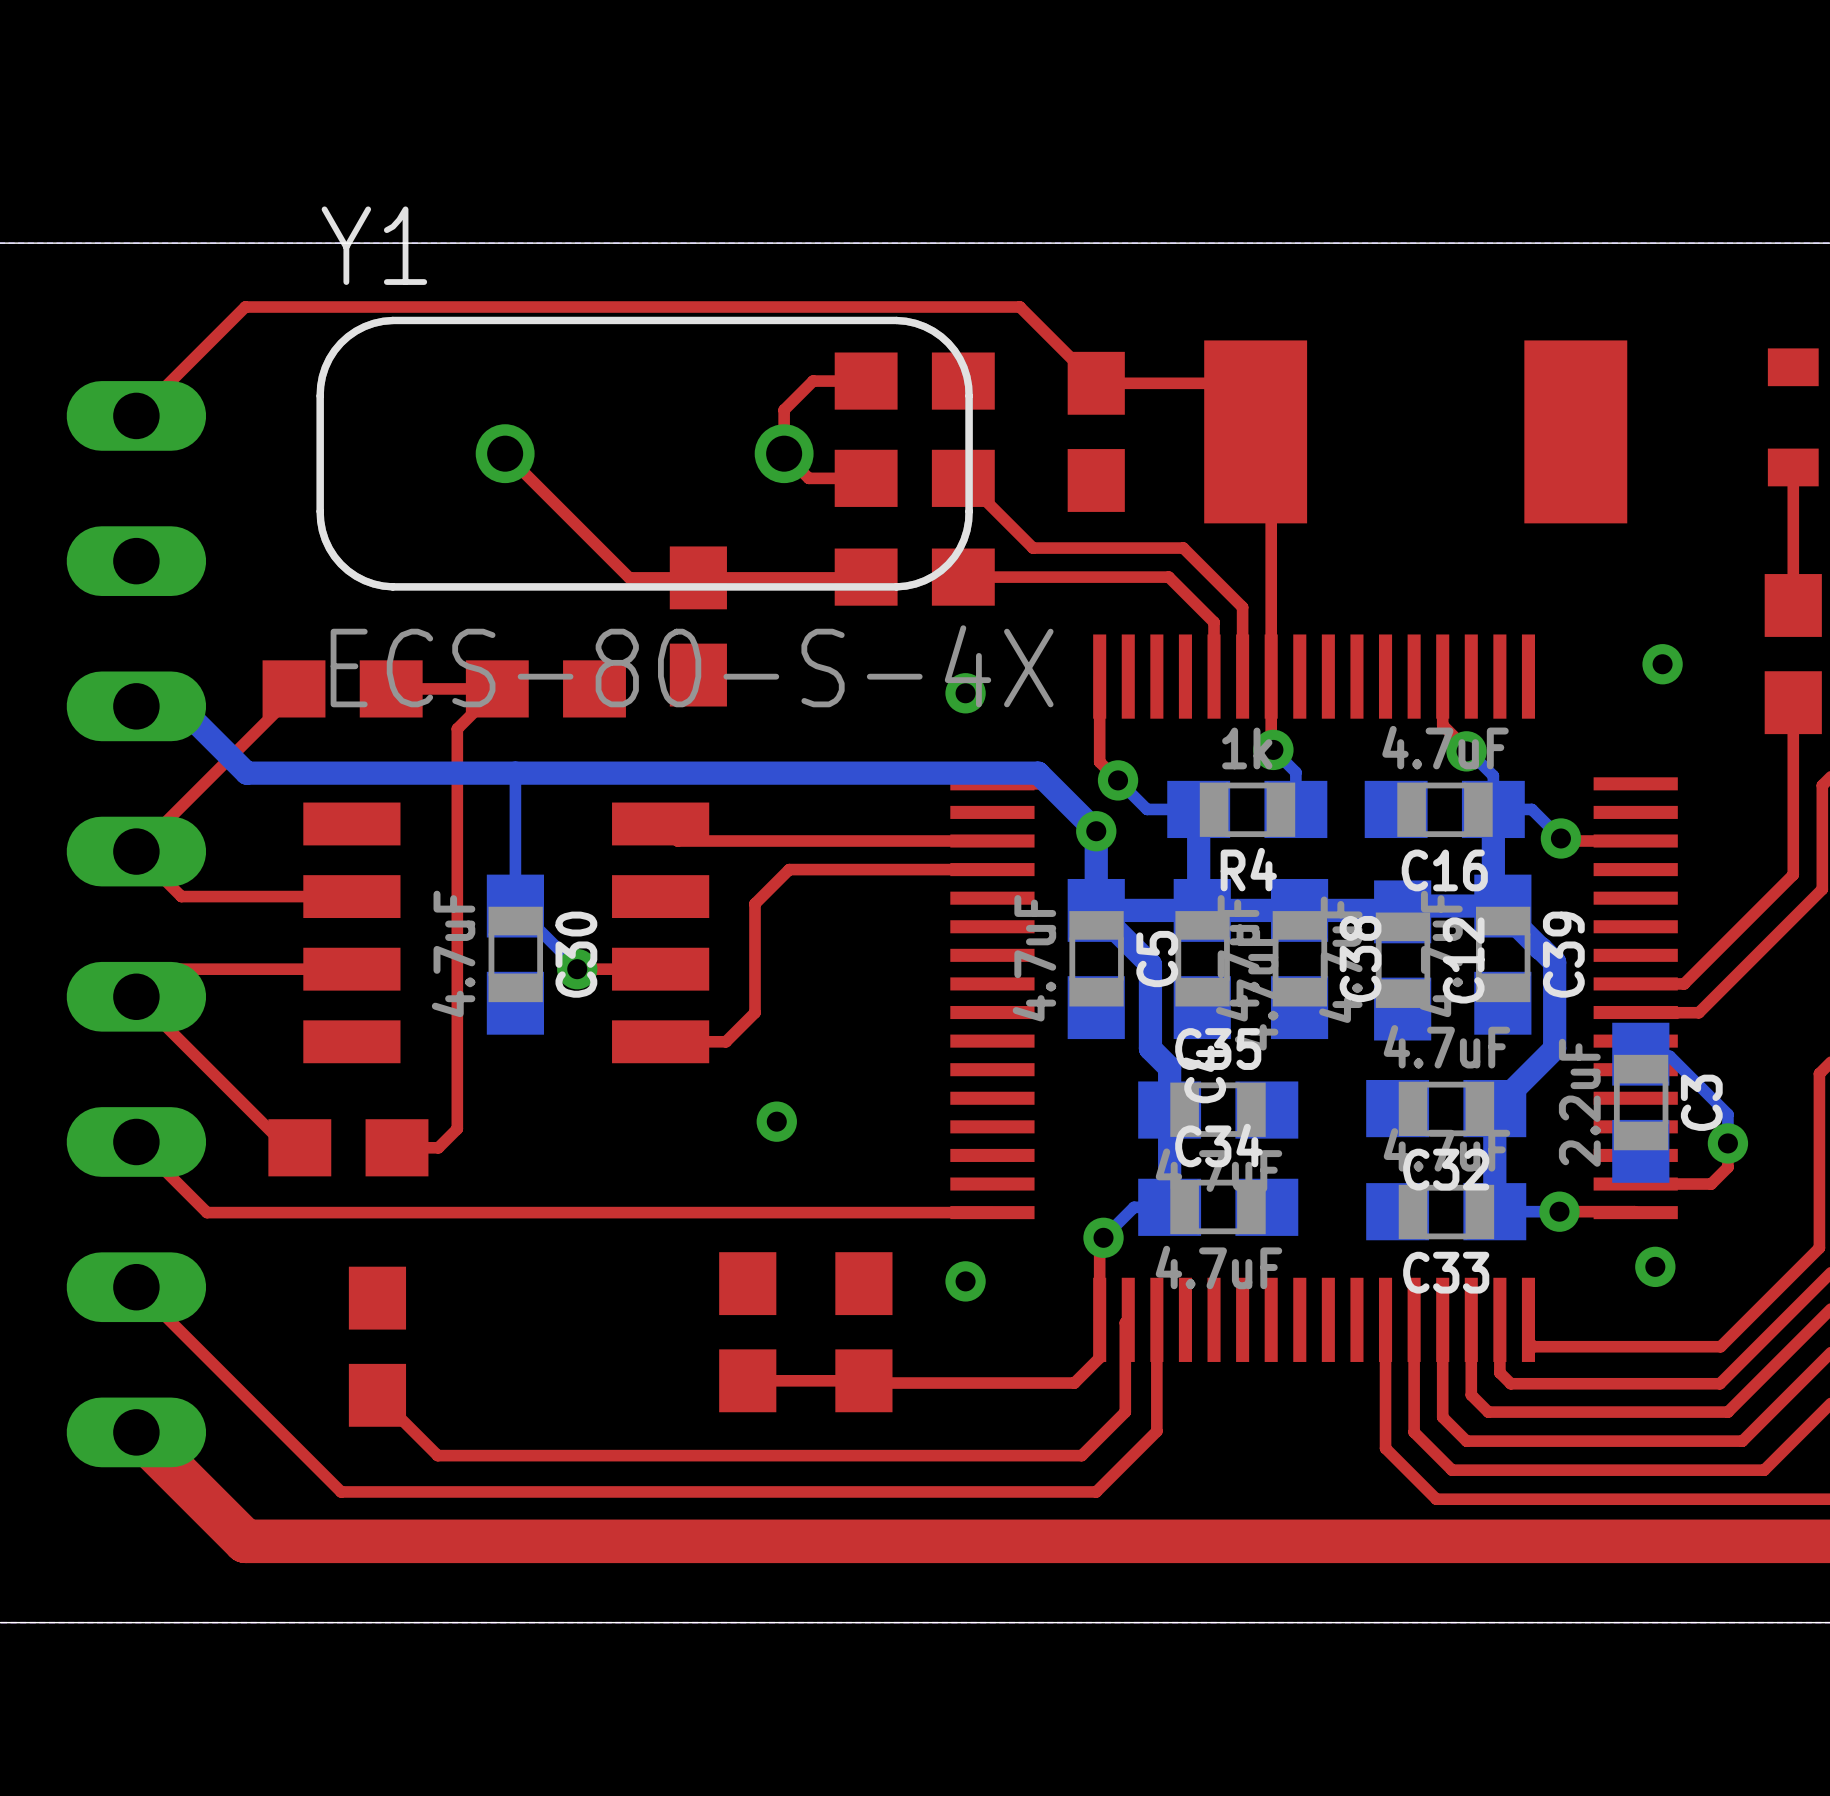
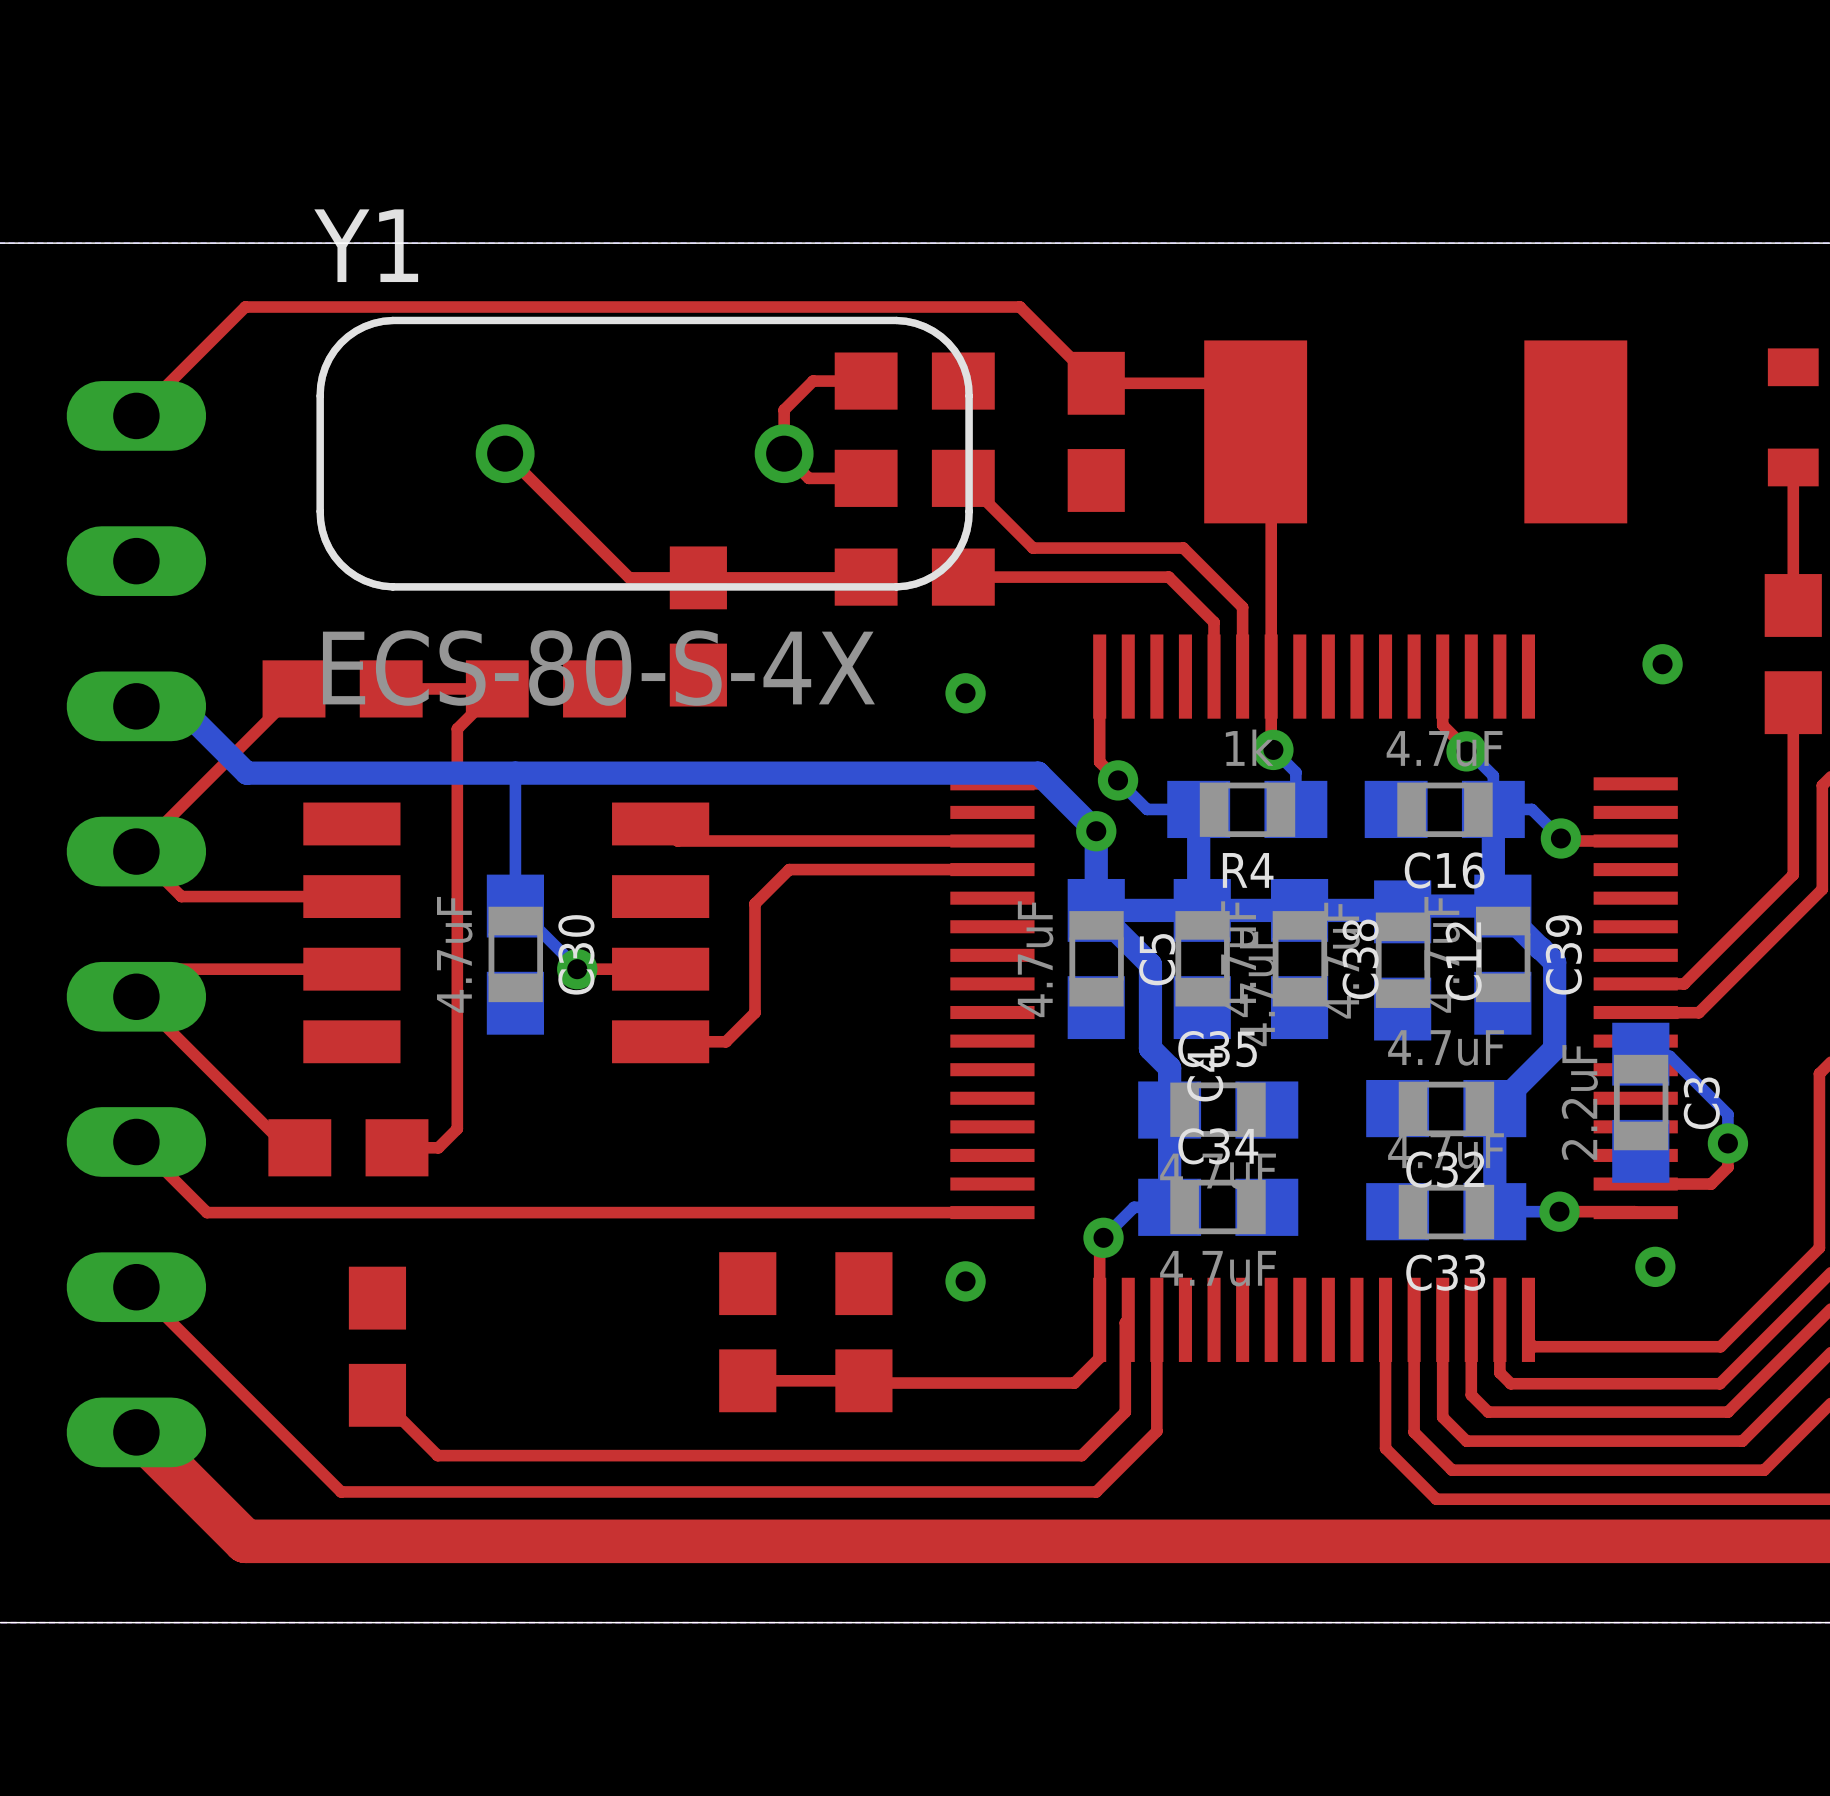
via: (776, 1121) -> none

